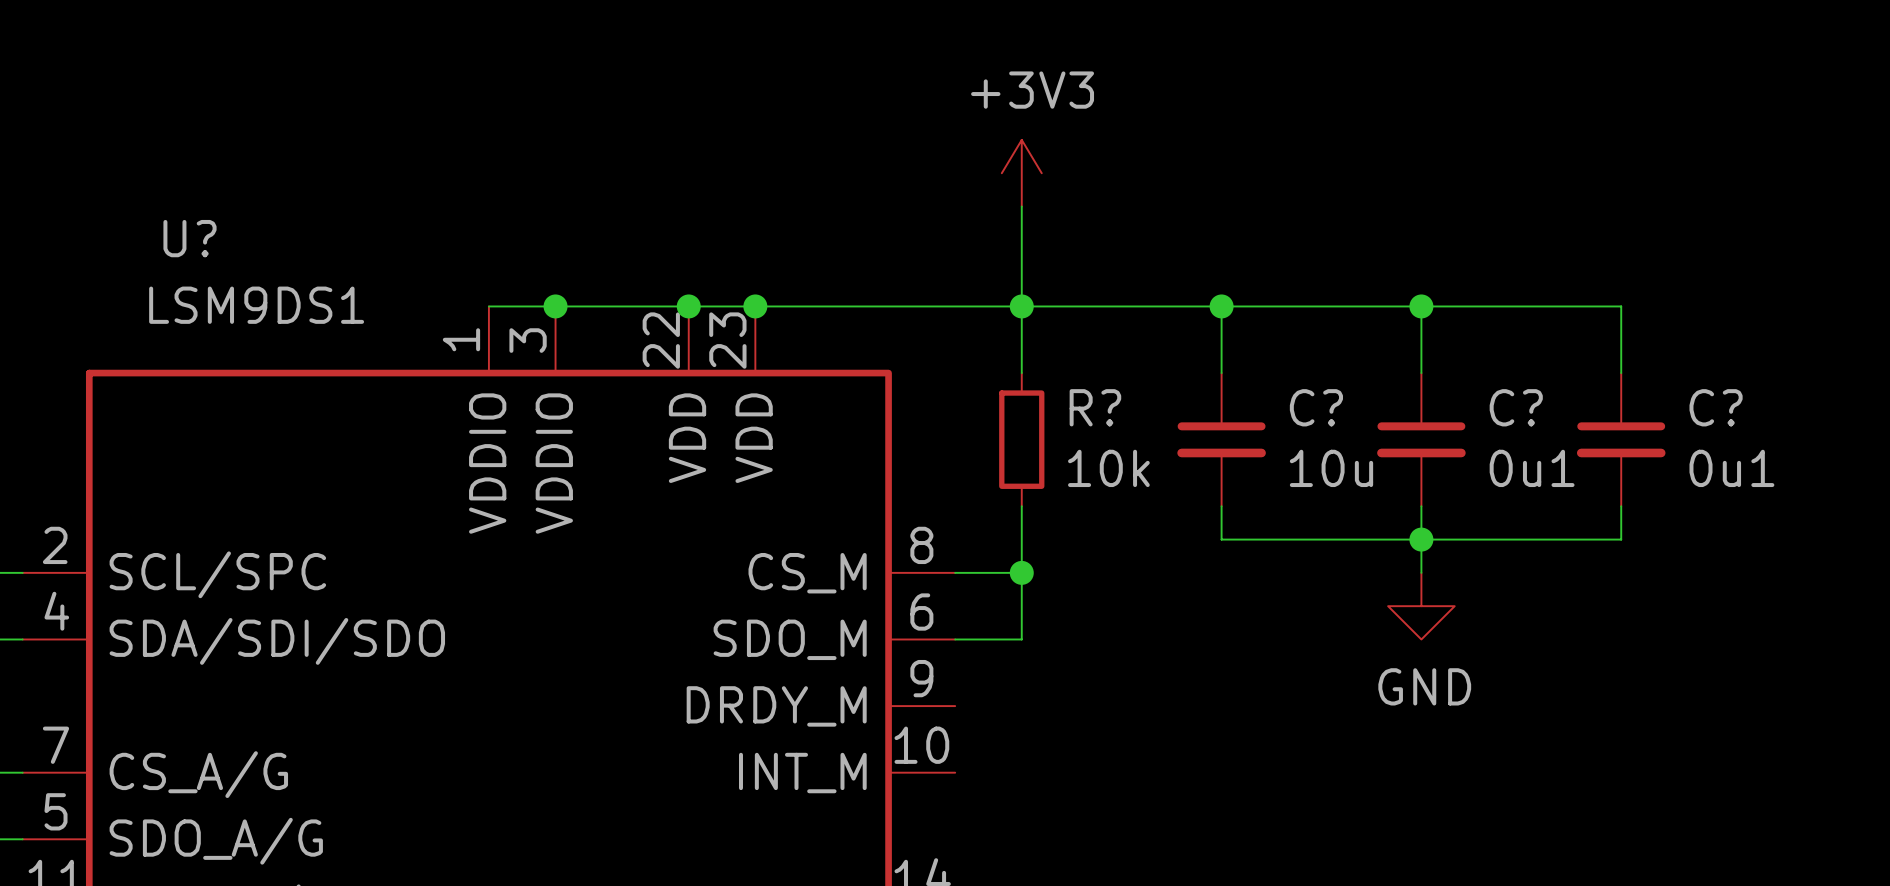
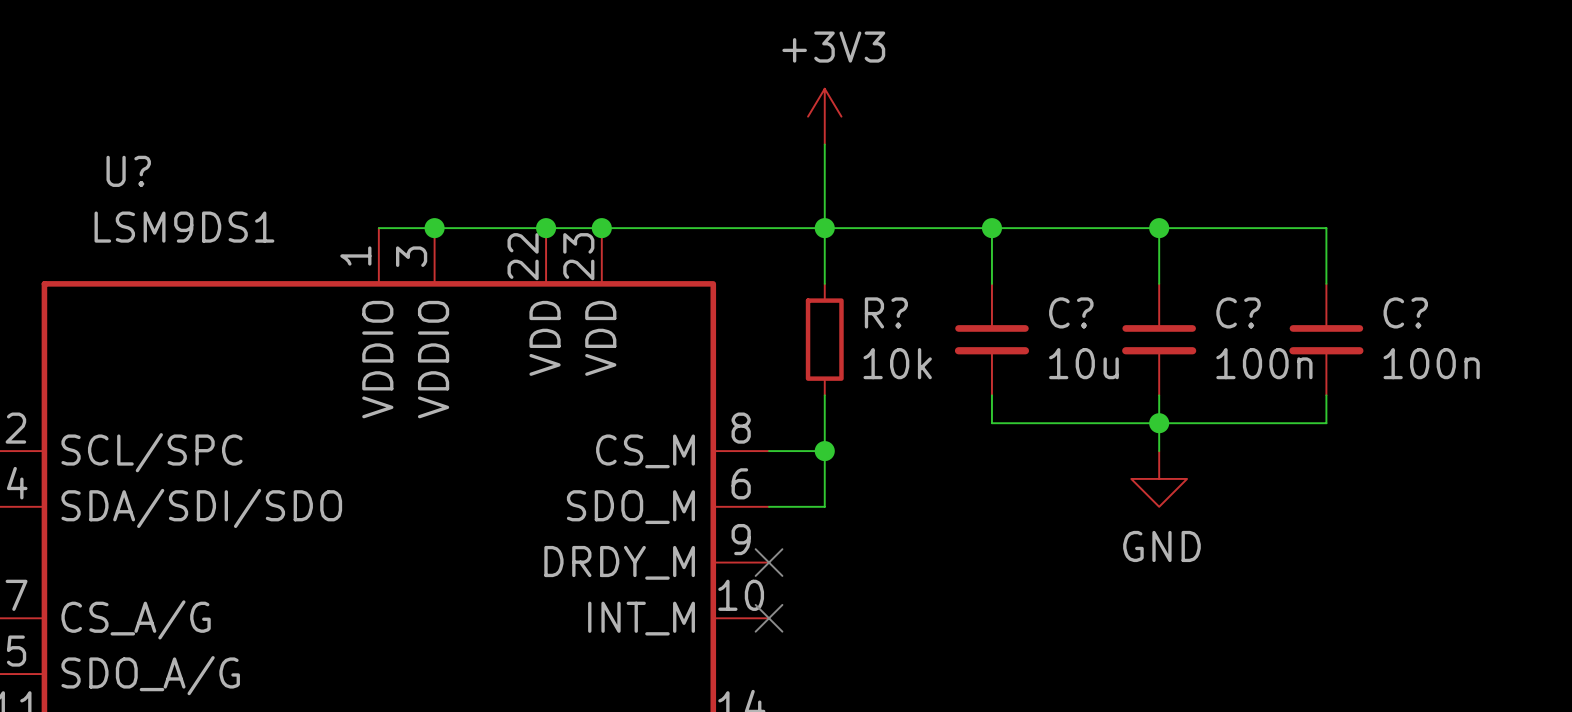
C? value: 0u1 (1532, 468) -> 100n (1264, 363)
C? value: 0u1 (1731, 468) -> 100n (1431, 363)
no-connect mark: none -> (769, 562)
no-connect mark: none -> (769, 618)

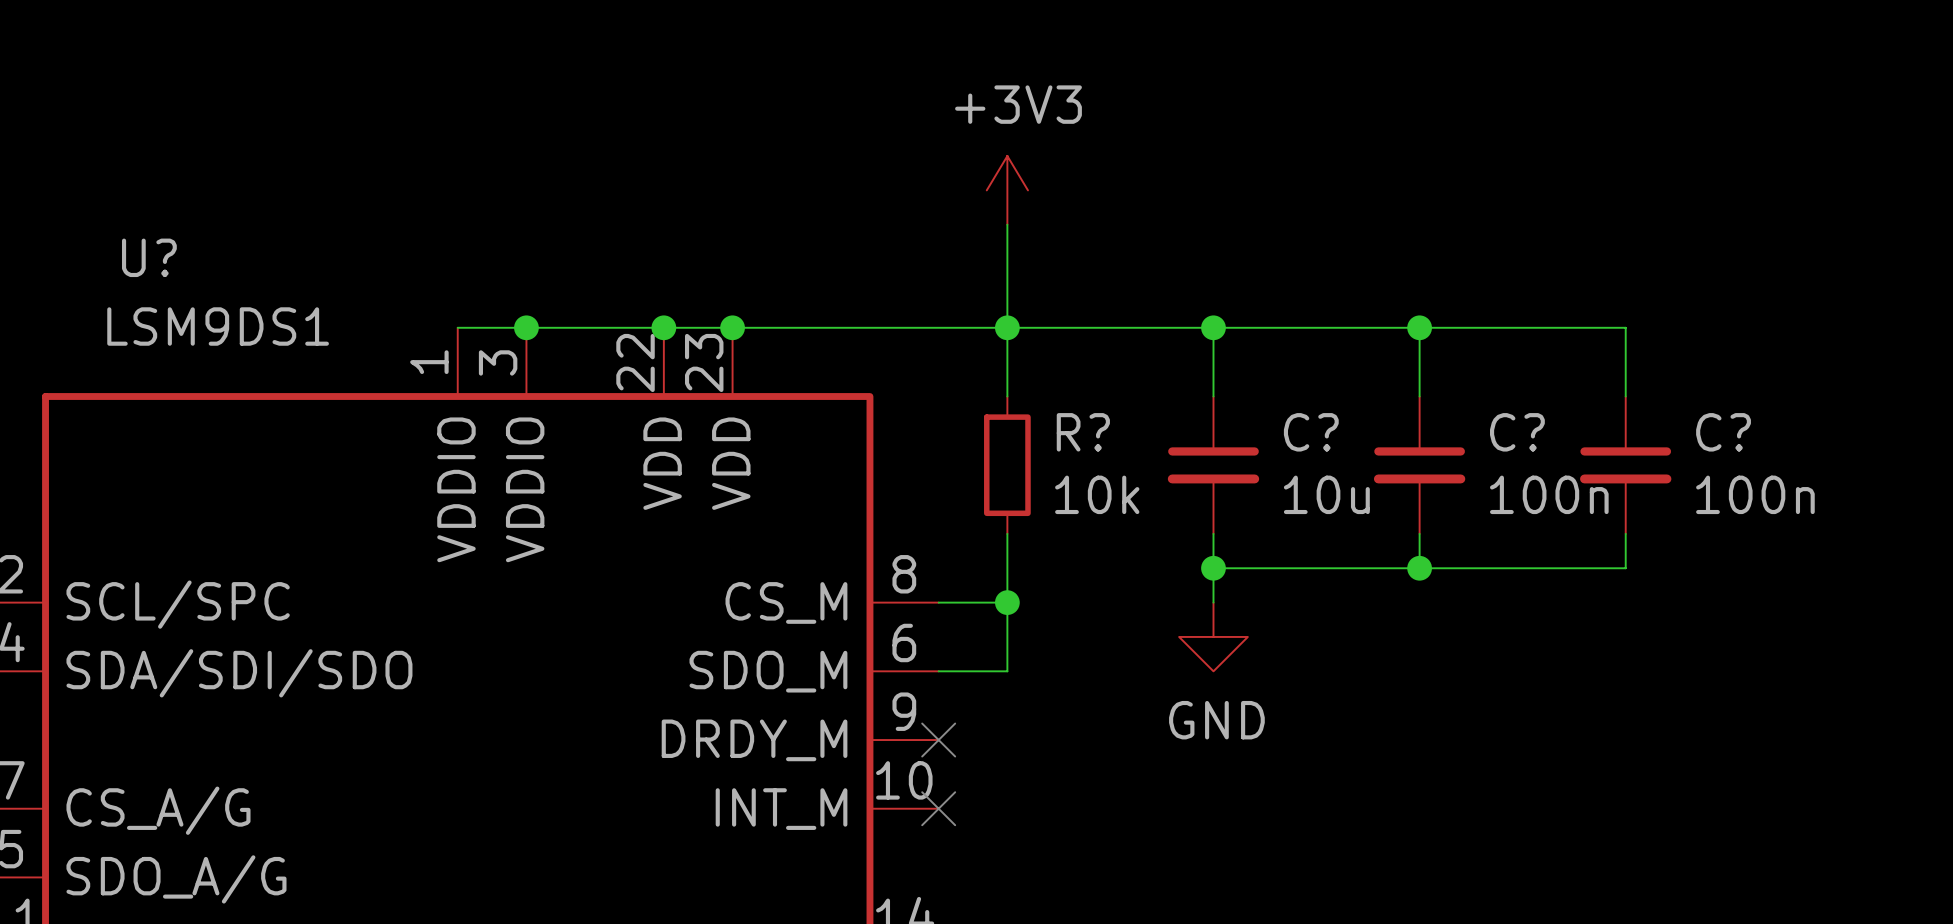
junction: none -> (1213, 568)
wire: (1159, 423) (1159, 451) -> (1213, 568) (1213, 602)
power symbol position: GND (1159, 478) -> GND (1213, 636)

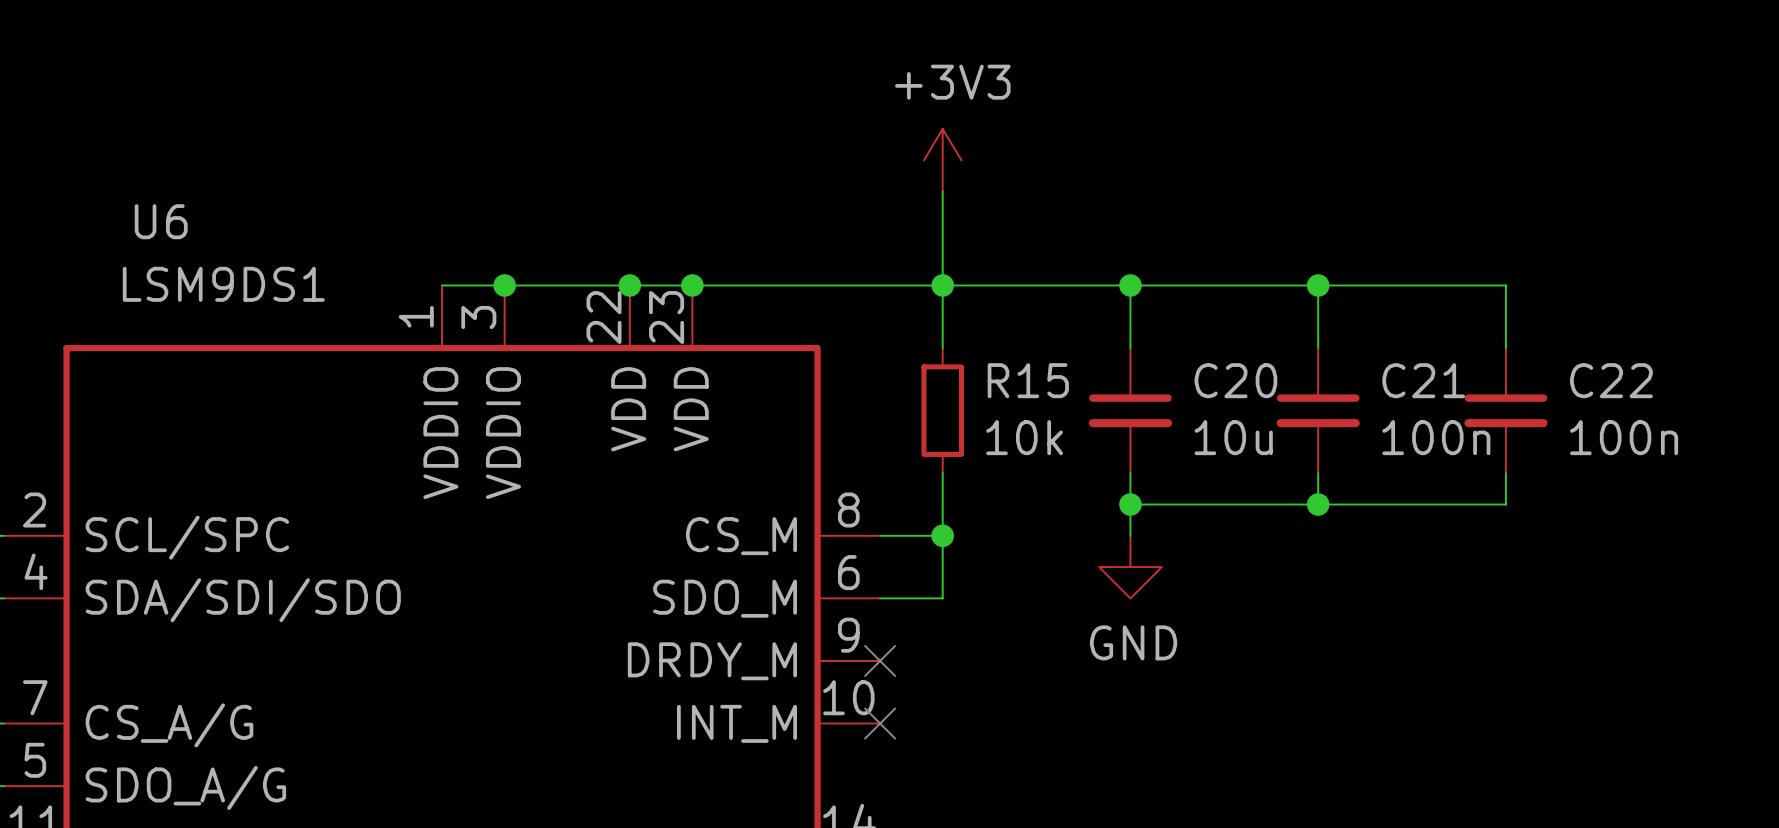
U? name: U? (149, 257) -> U6 (161, 221)
R? name: R? (1083, 432) -> R15 (1028, 380)
C? name: C? (1311, 432) -> C20 (1235, 380)
C? name: C? (1517, 432) -> C21 (1423, 380)
C? name: C? (1723, 432) -> C22 (1611, 380)

